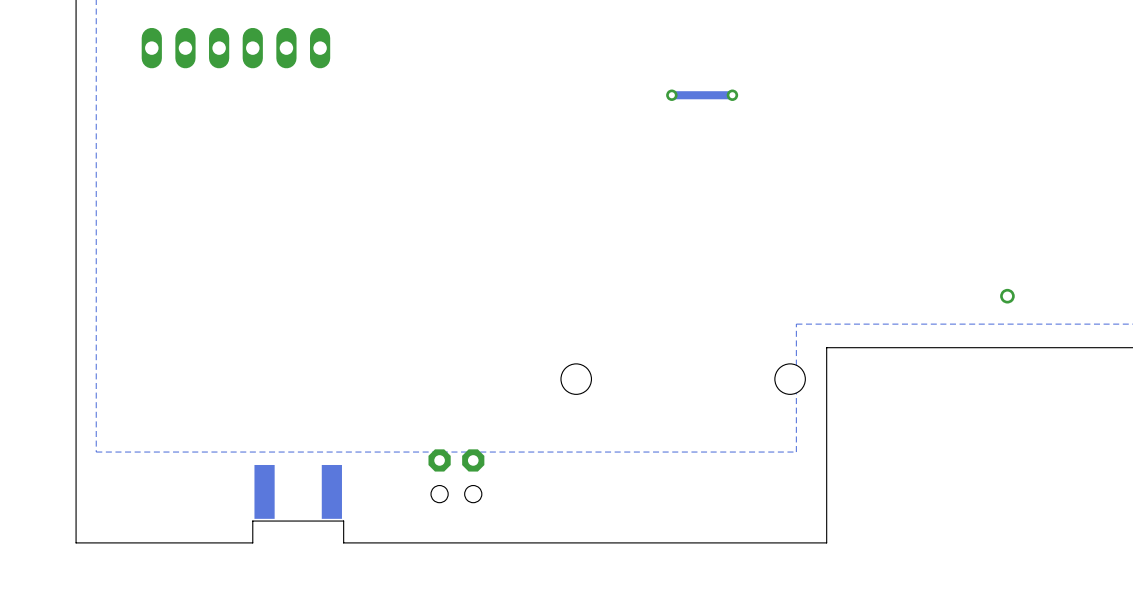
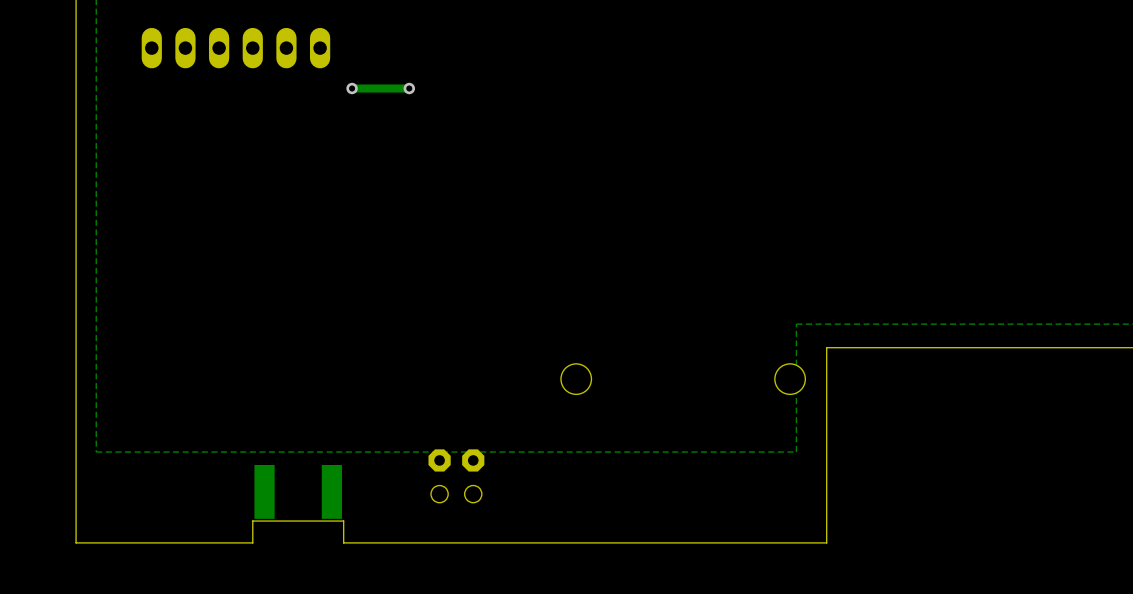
via: none -> (352, 88)
track: none -> (409, 88) (352, 88)
via: none -> (409, 88)
via: (671, 95) -> none
track: (732, 95) (671, 95) -> none
via: (732, 95) -> none
via: (1007, 296) -> none

